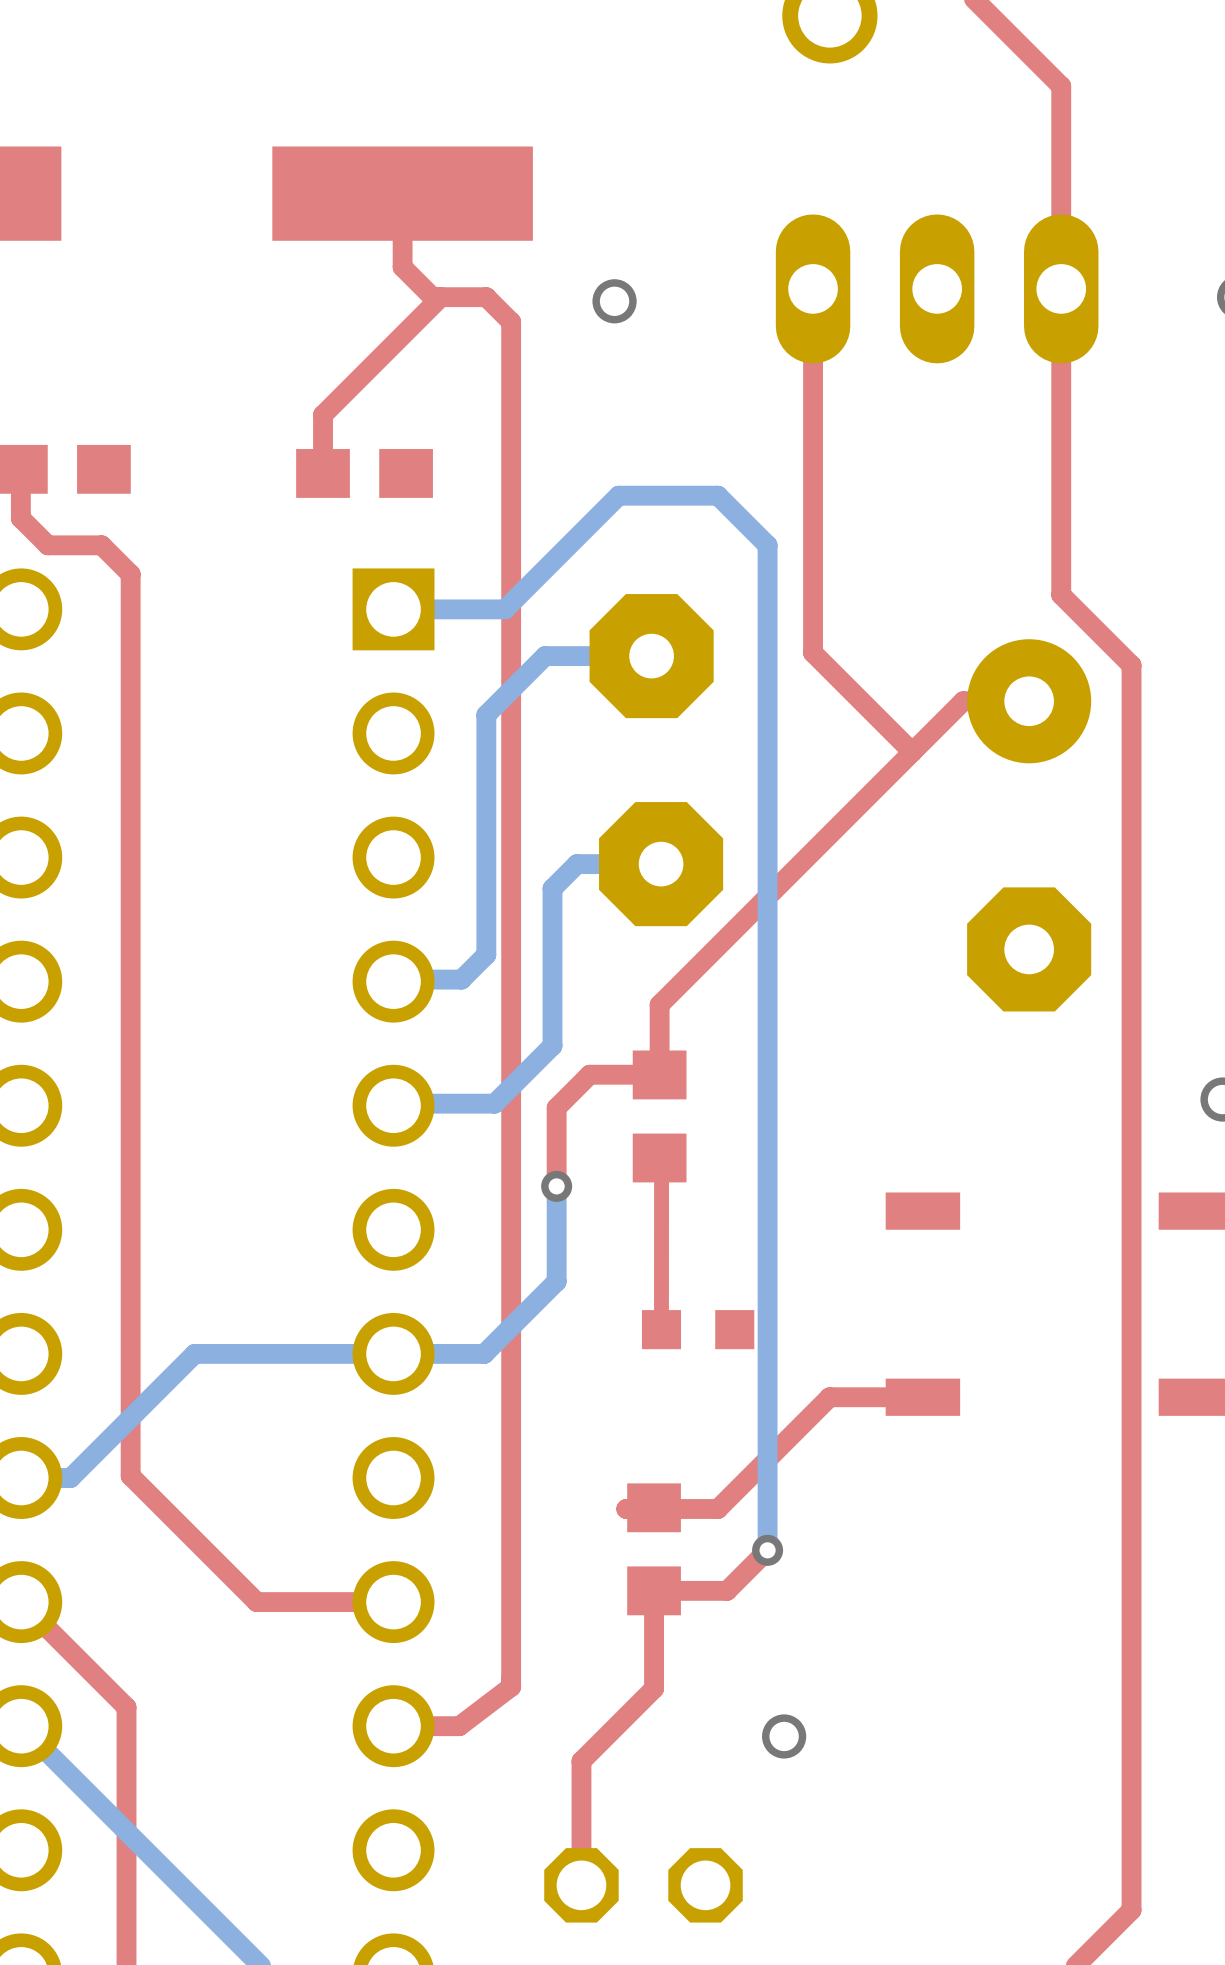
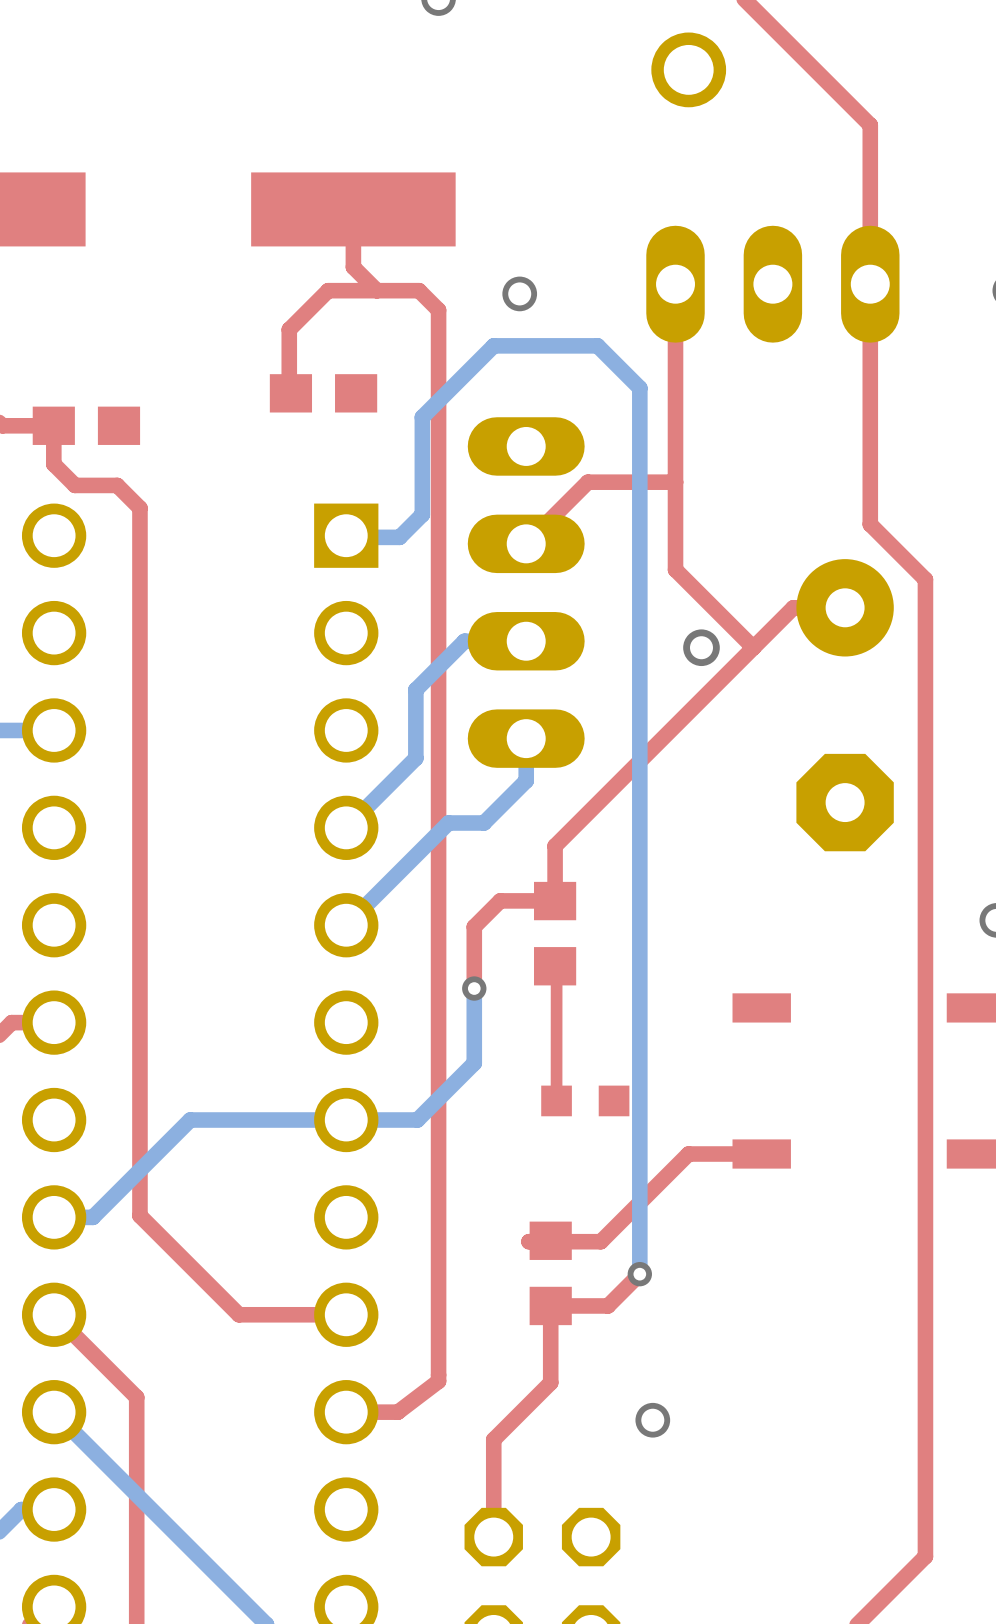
top track: none -> (376, 290) (328, 290) (289, 329) (289, 391) (290, 393)
top track: (440, 297) (323, 415) (323, 473) (320, 471) -> none
part position: (364, 473) -> (323, 393)
top track: none -> (675, 482) (587, 482) (526, 543)
bottom track: (767, 545) (717, 495) (618, 495) (505, 609) (393, 609) -> (639, 485) (639, 388) (597, 345) (493, 345) (422, 417) (422, 514) (399, 537) (347, 537) (346, 535)
part footprint: [589, 594, 714, 719] -> [467, 417, 585, 768]
bottom track: (651, 656) (545, 656) (486, 714) (486, 954) (461, 979) (395, 979) -> (526, 641) (464, 641) (415, 689) (415, 758) (347, 826)
via: none -> (701, 647)
bottom track: (661, 864) (577, 864) (552, 888) (552, 1045) (494, 1103) (395, 1103) -> (526, 738) (526, 780) (484, 823) (448, 823) (347, 923)
part: (661, 864) -> none

